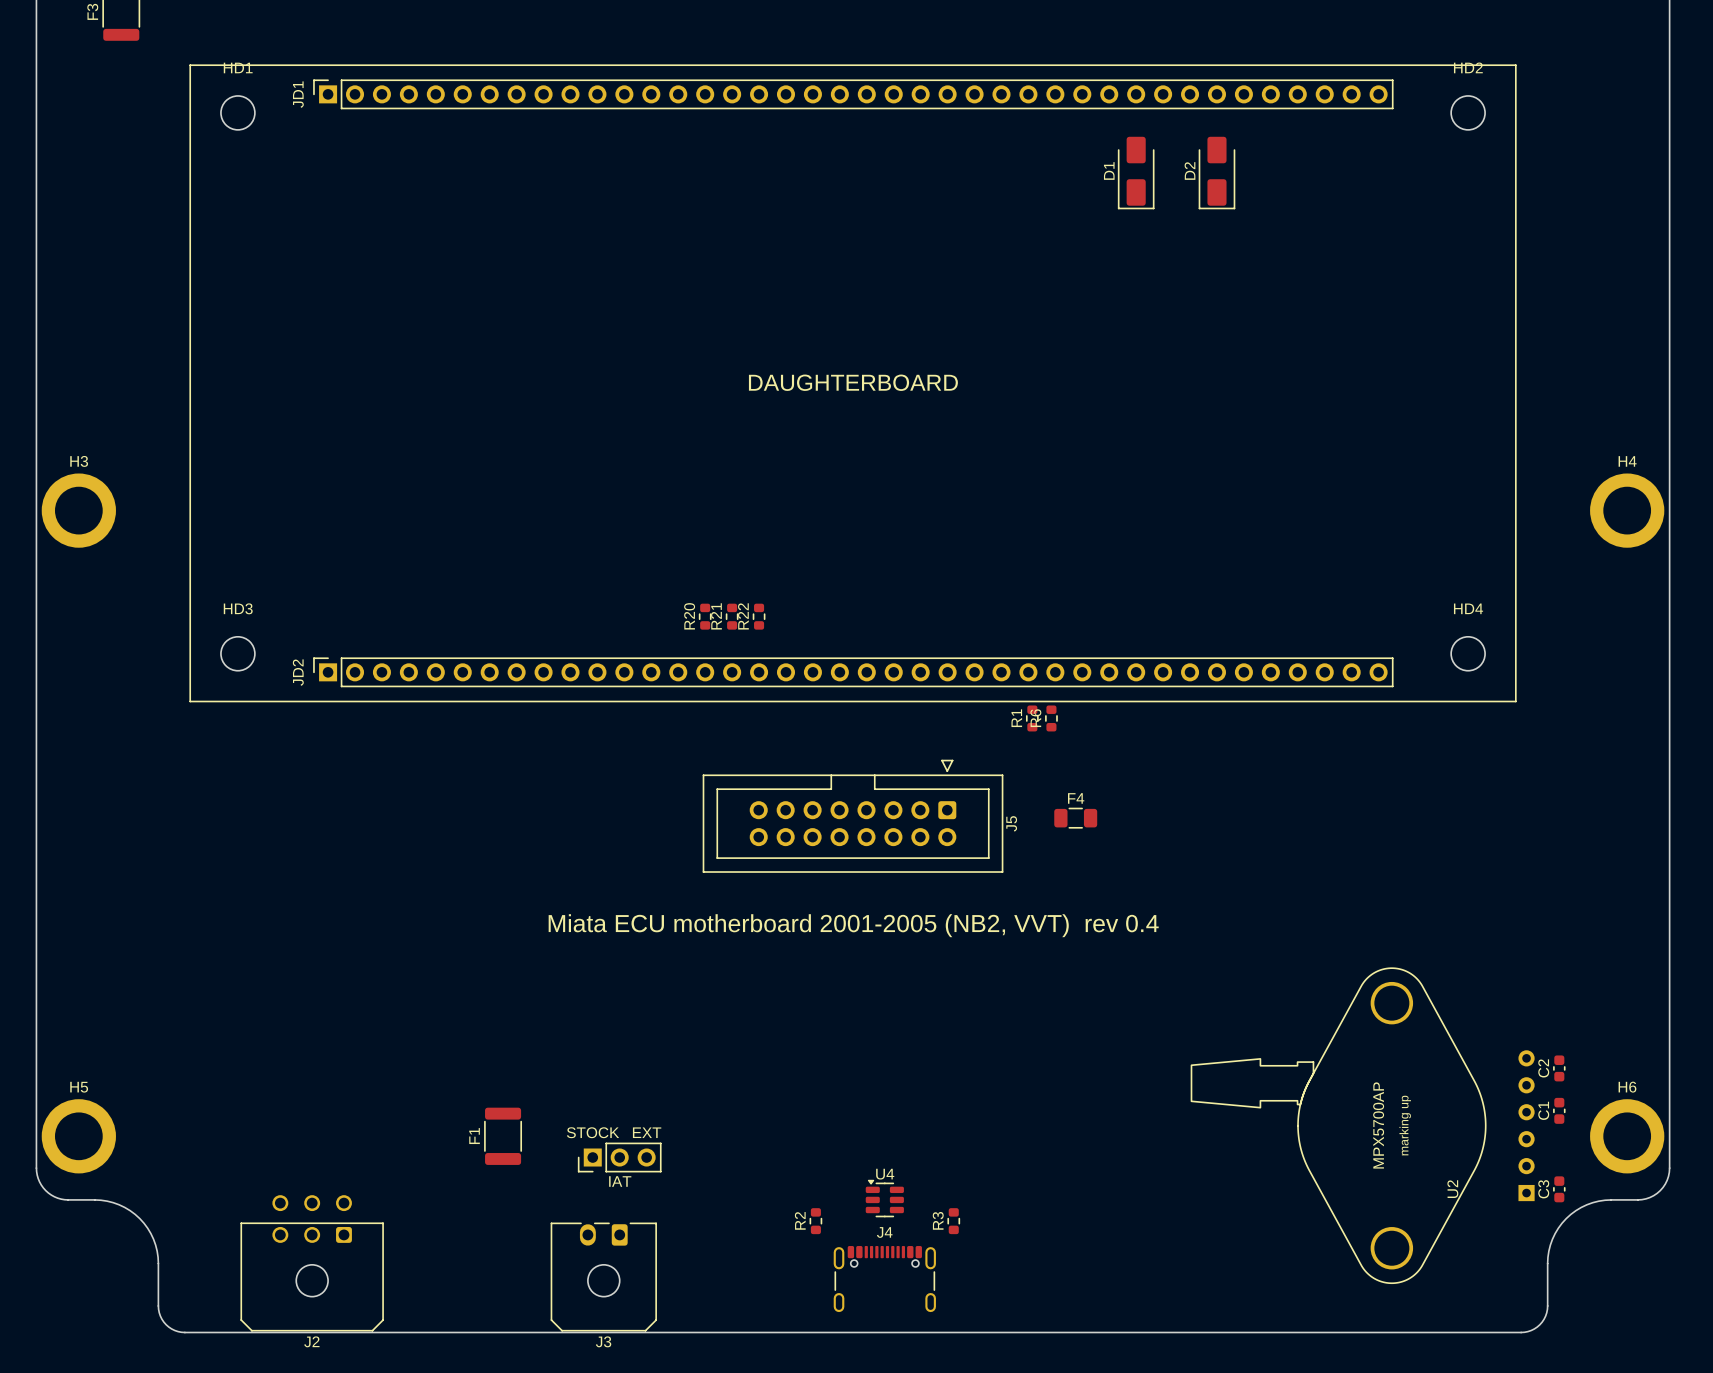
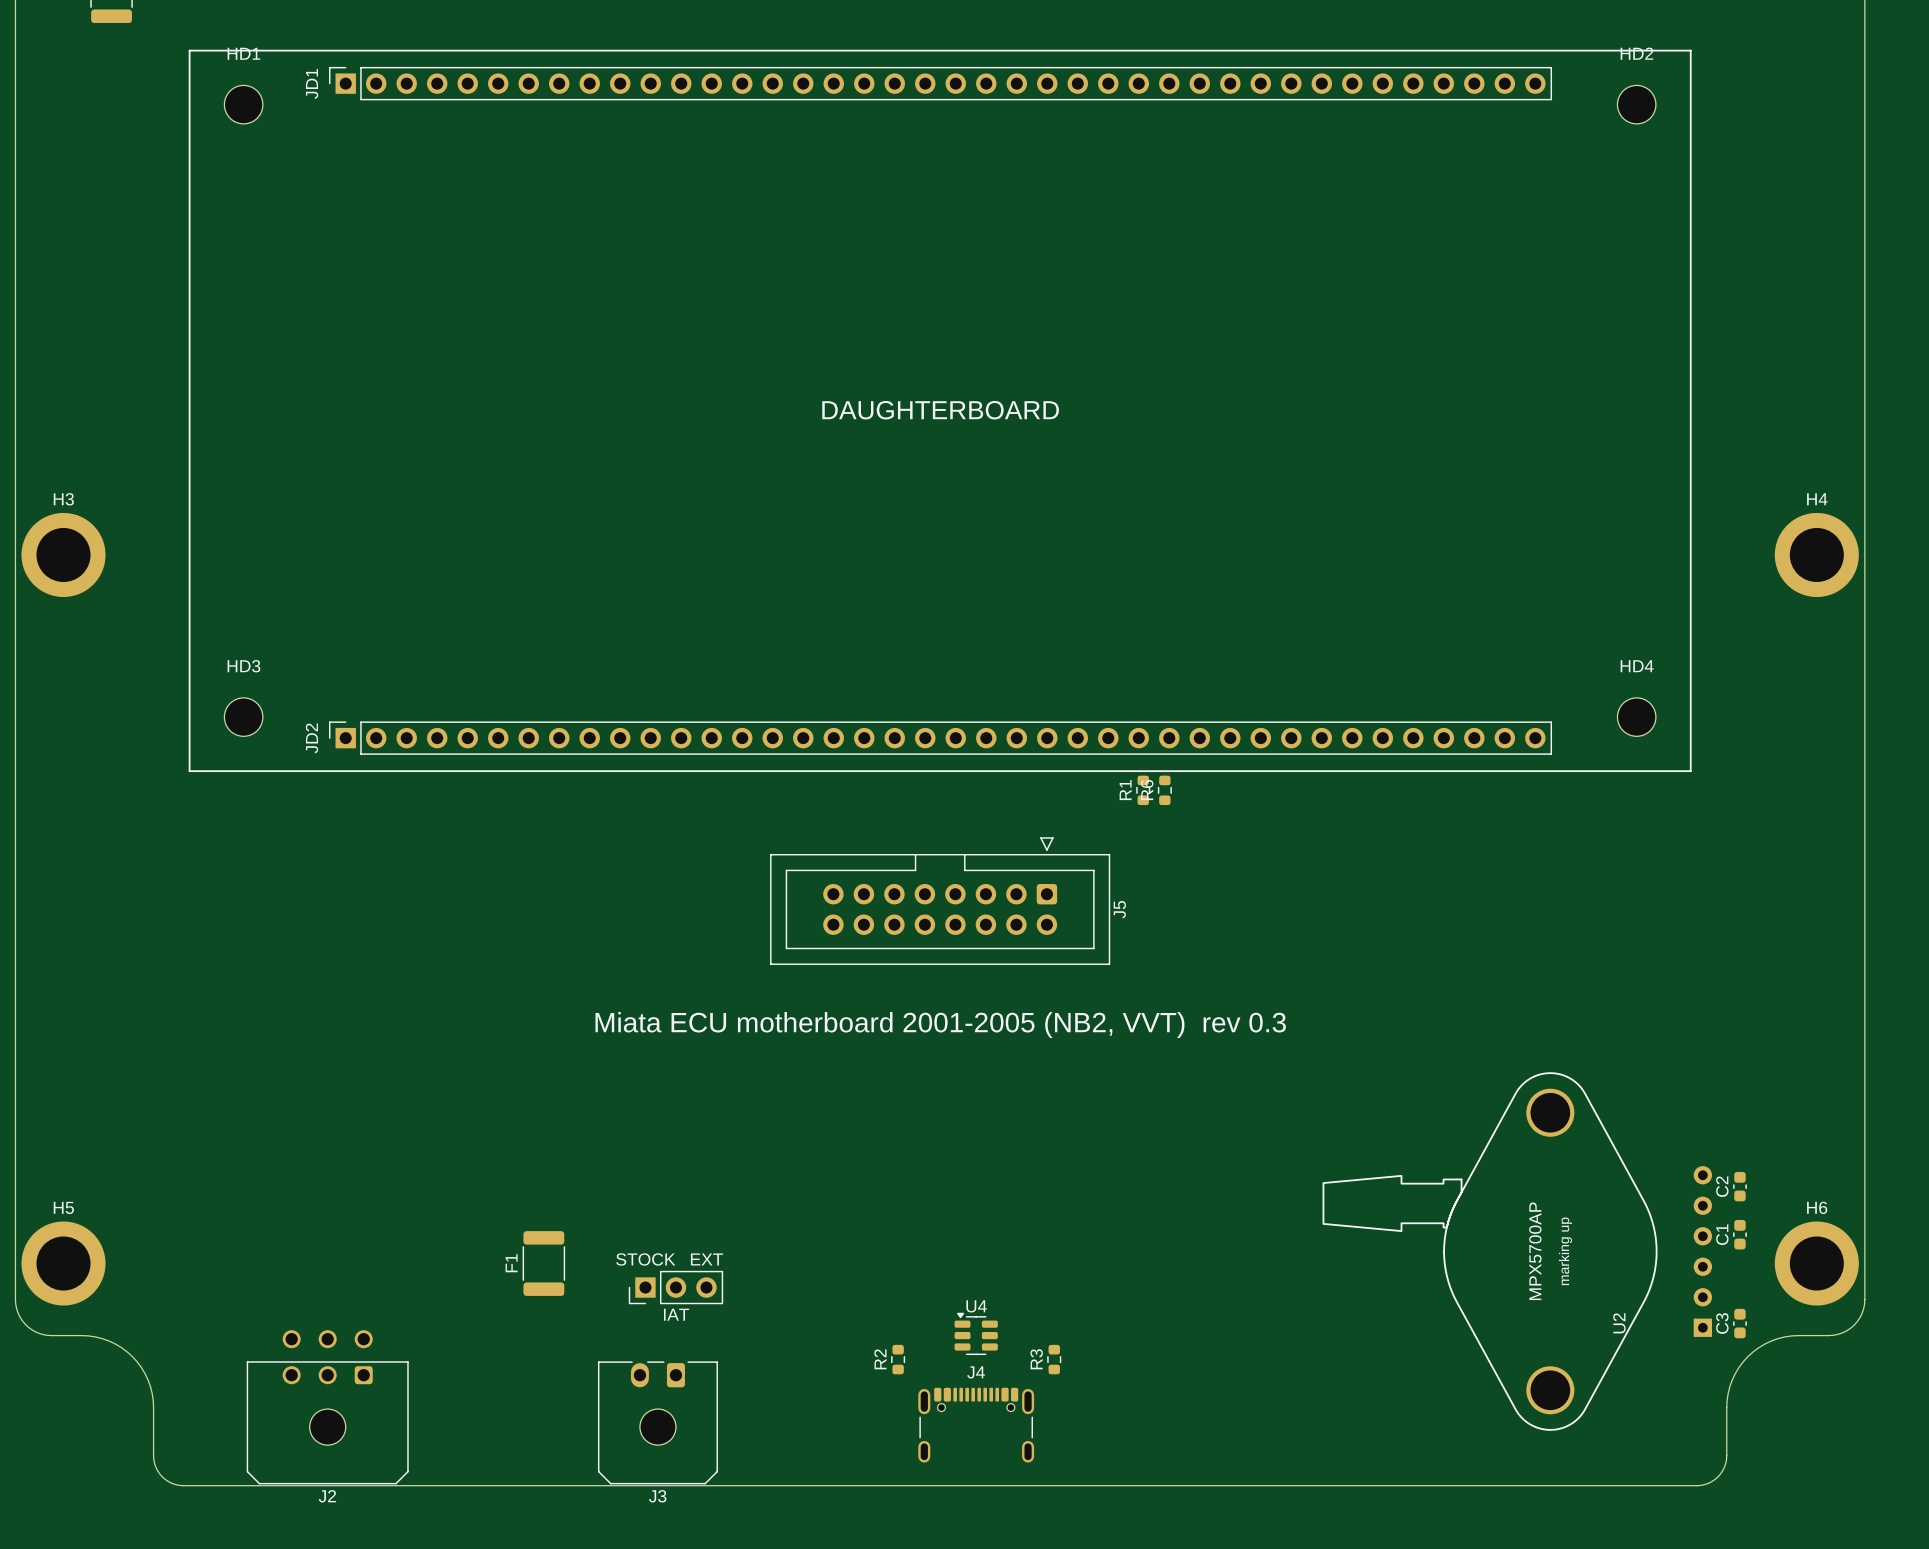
D1: (1136, 172) -> none
D2: (1216, 172) -> none
R20: (705, 616) -> none
R21: (732, 616) -> none
R22: (759, 616) -> none
F4: (1075, 818) -> none
text: Miata ECU motherboard 2001-2005 (NB2, VVT) rev 0.4 (853, 925) -> Miata ECU motherboard 2001-2005 (NB2, VVT) rev 0.3 (940, 1025)

